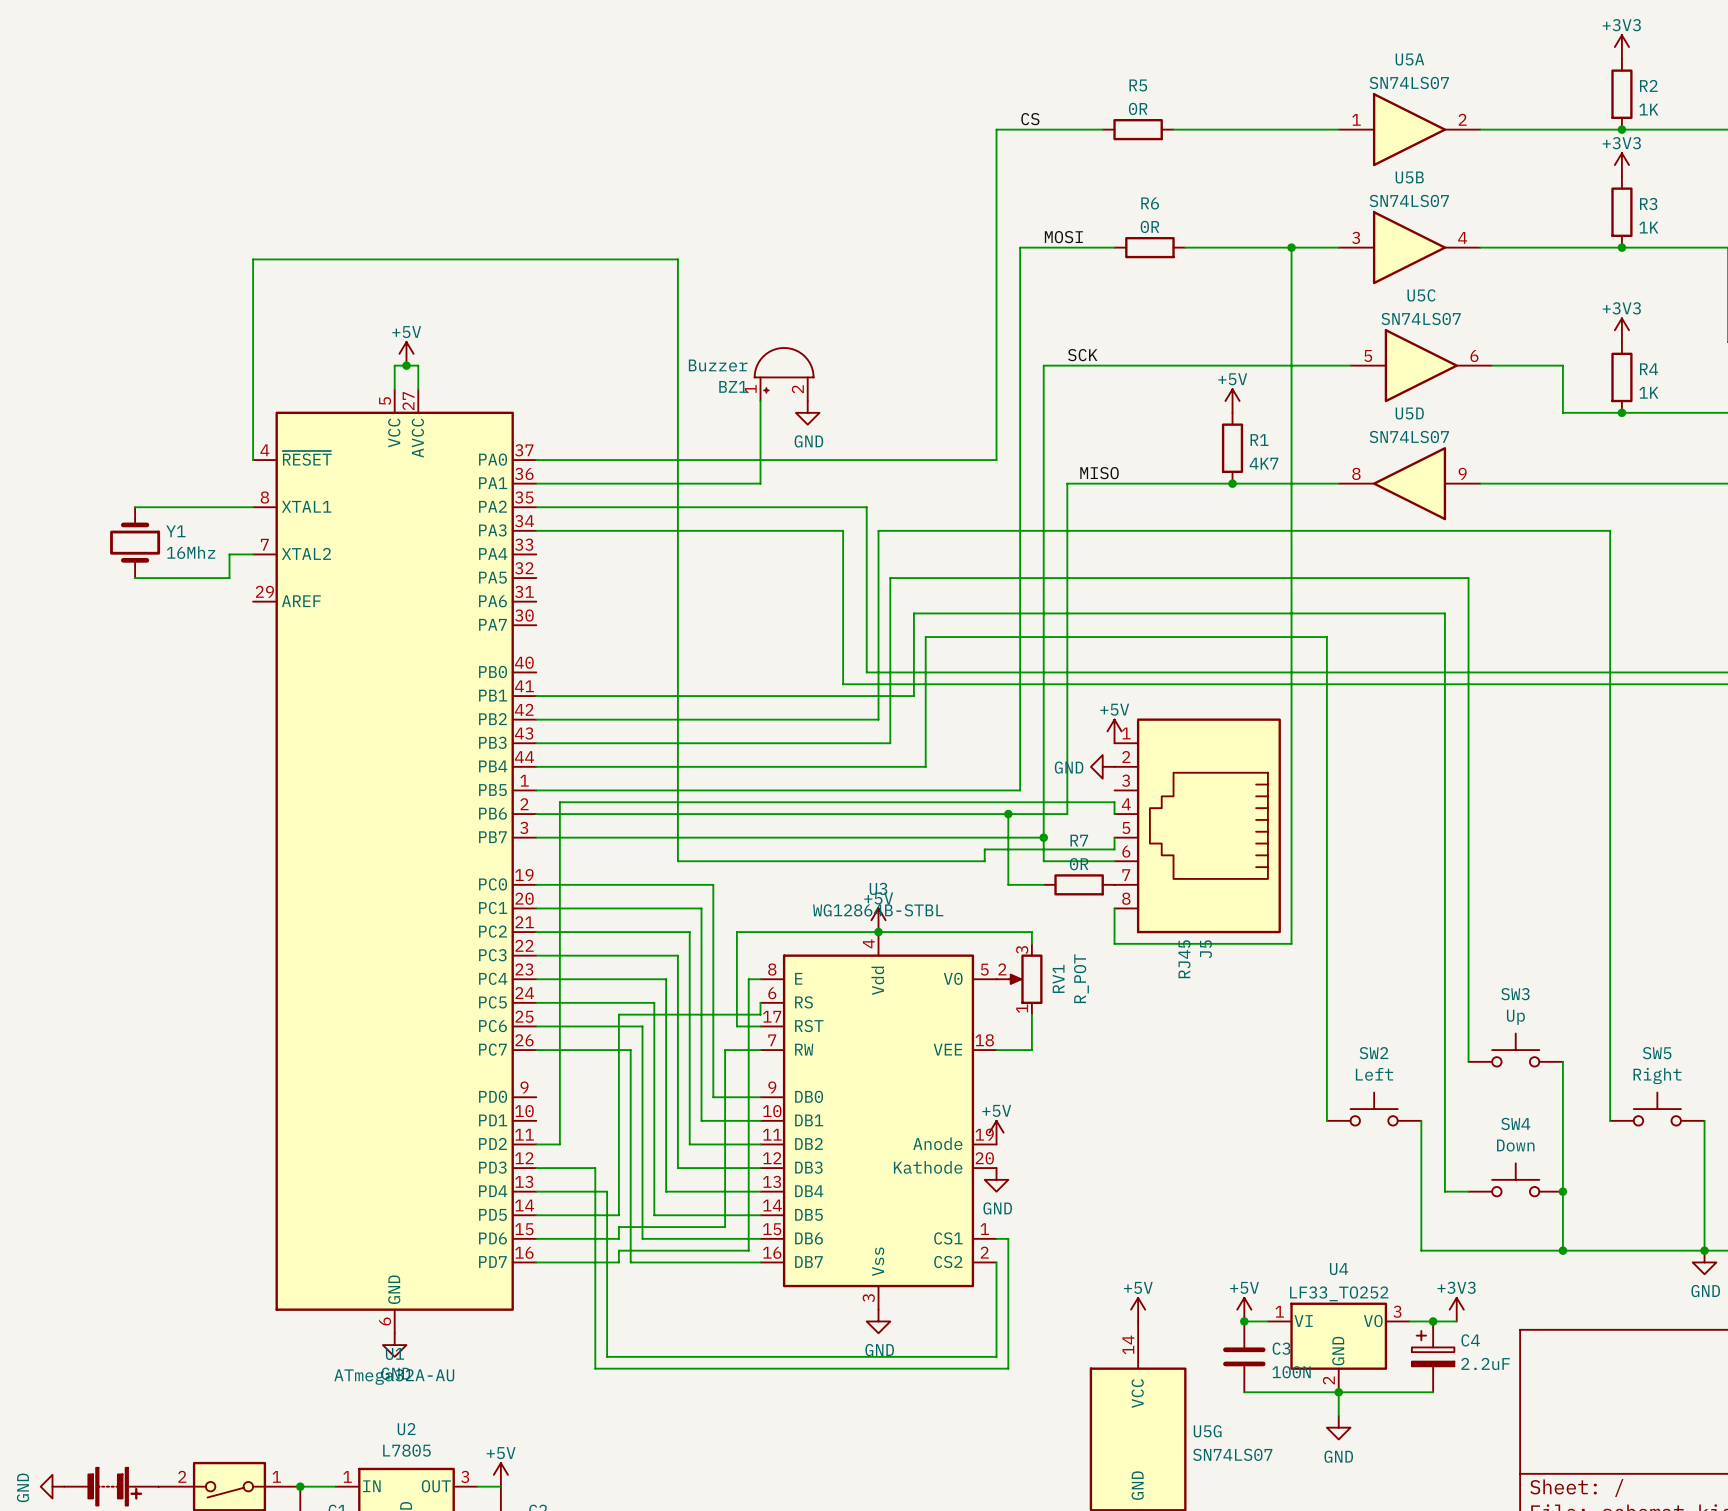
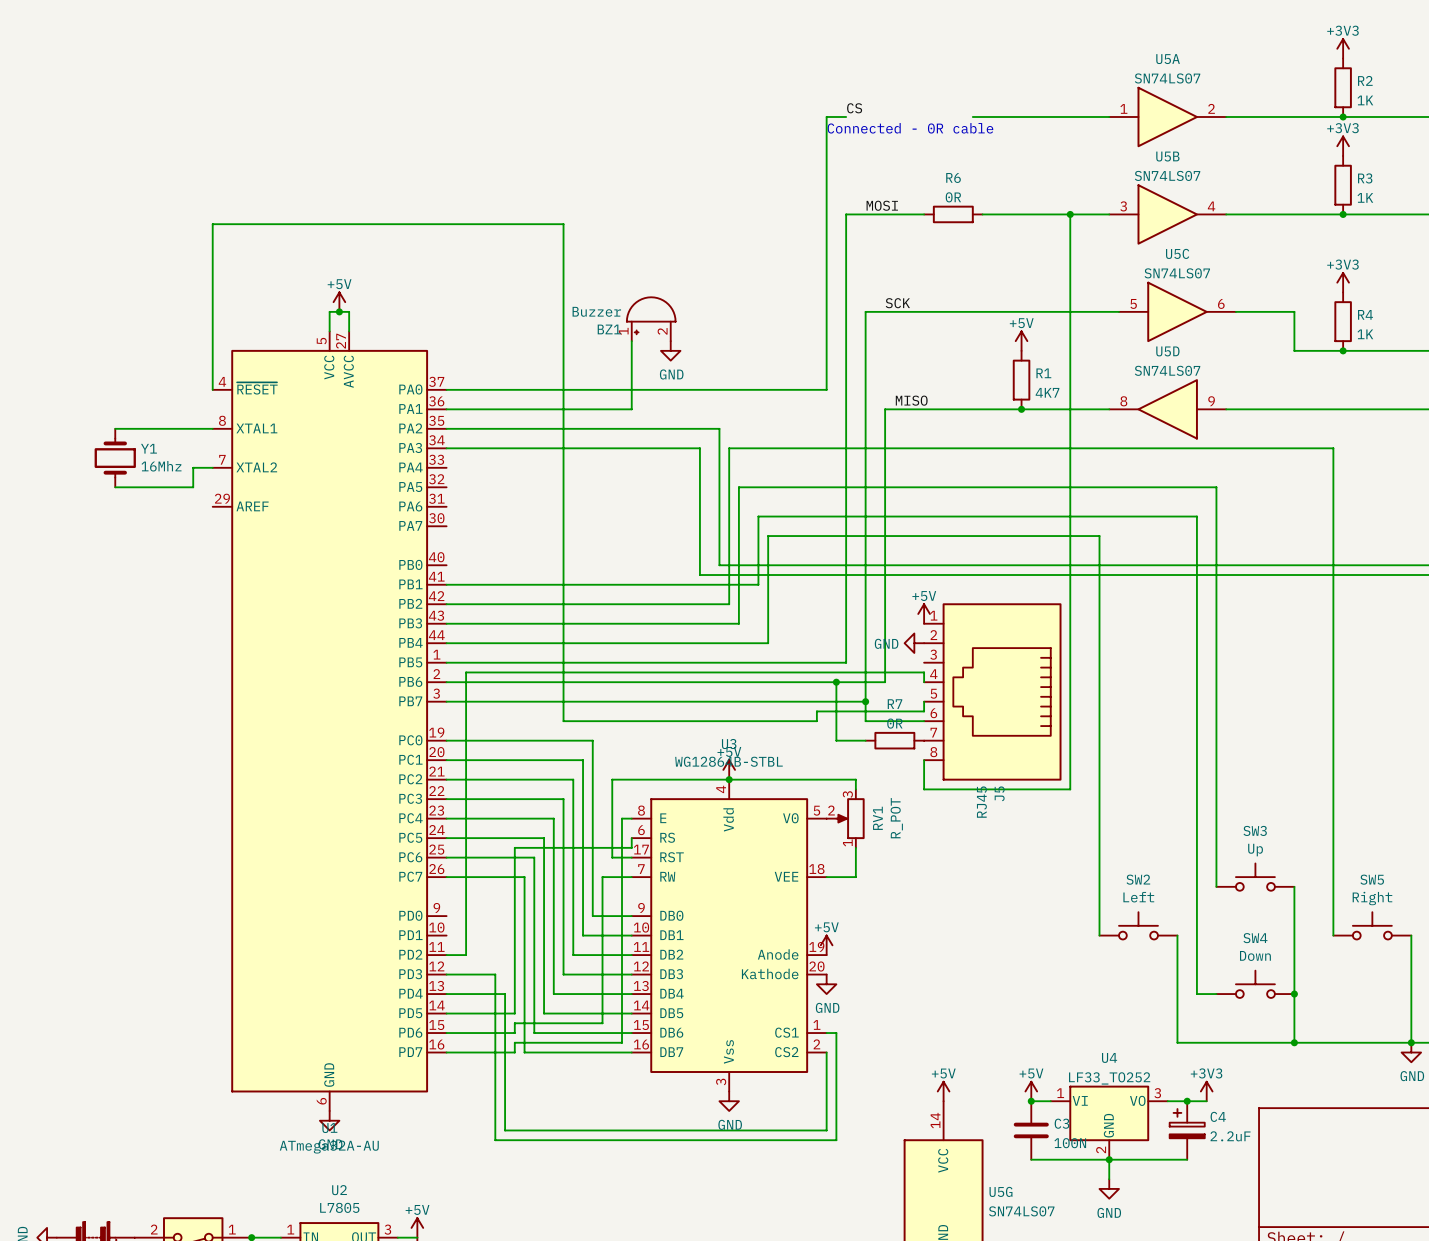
wire: (1020, 129) (1102, 129) -> none
R5: 0R (1138, 129) -> none
text: none -> Connected - 0R cable (910, 128)

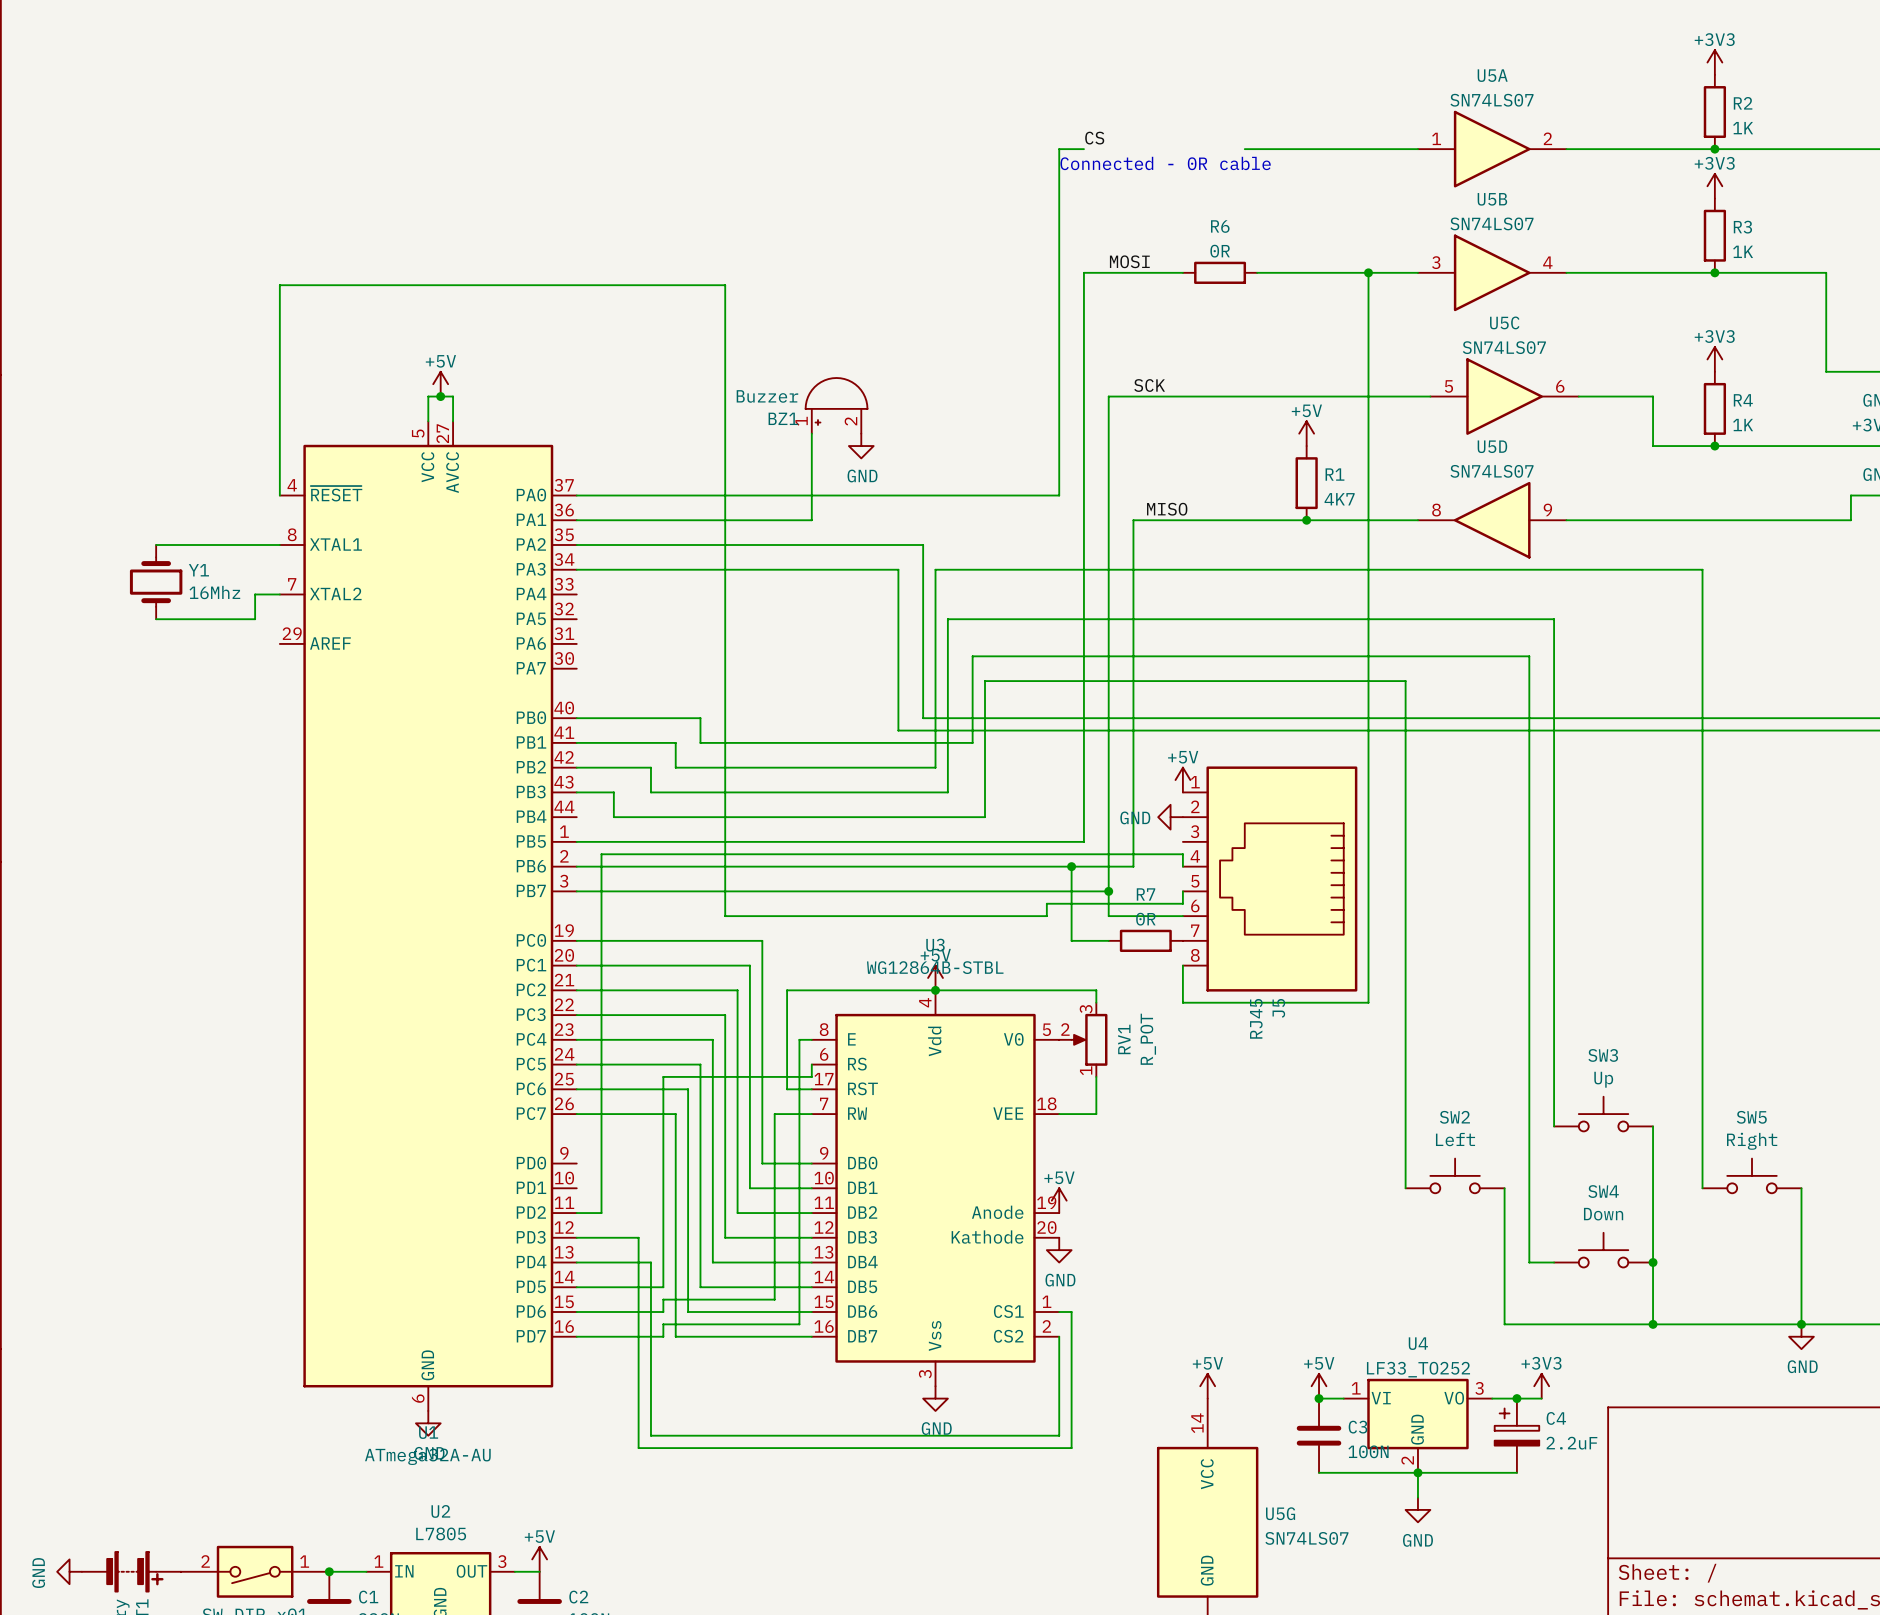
wire: none -> (576, 718) (700, 718) (700, 742)
wire: (524, 584) (544, 584) -> (675, 742) (675, 767)
wire: (505, 604) (524, 604) -> (650, 767) (650, 792)
wire: (475, 623) (505, 623) -> (613, 792) (613, 817)
wire: (446, 643) (475, 643) -> none

